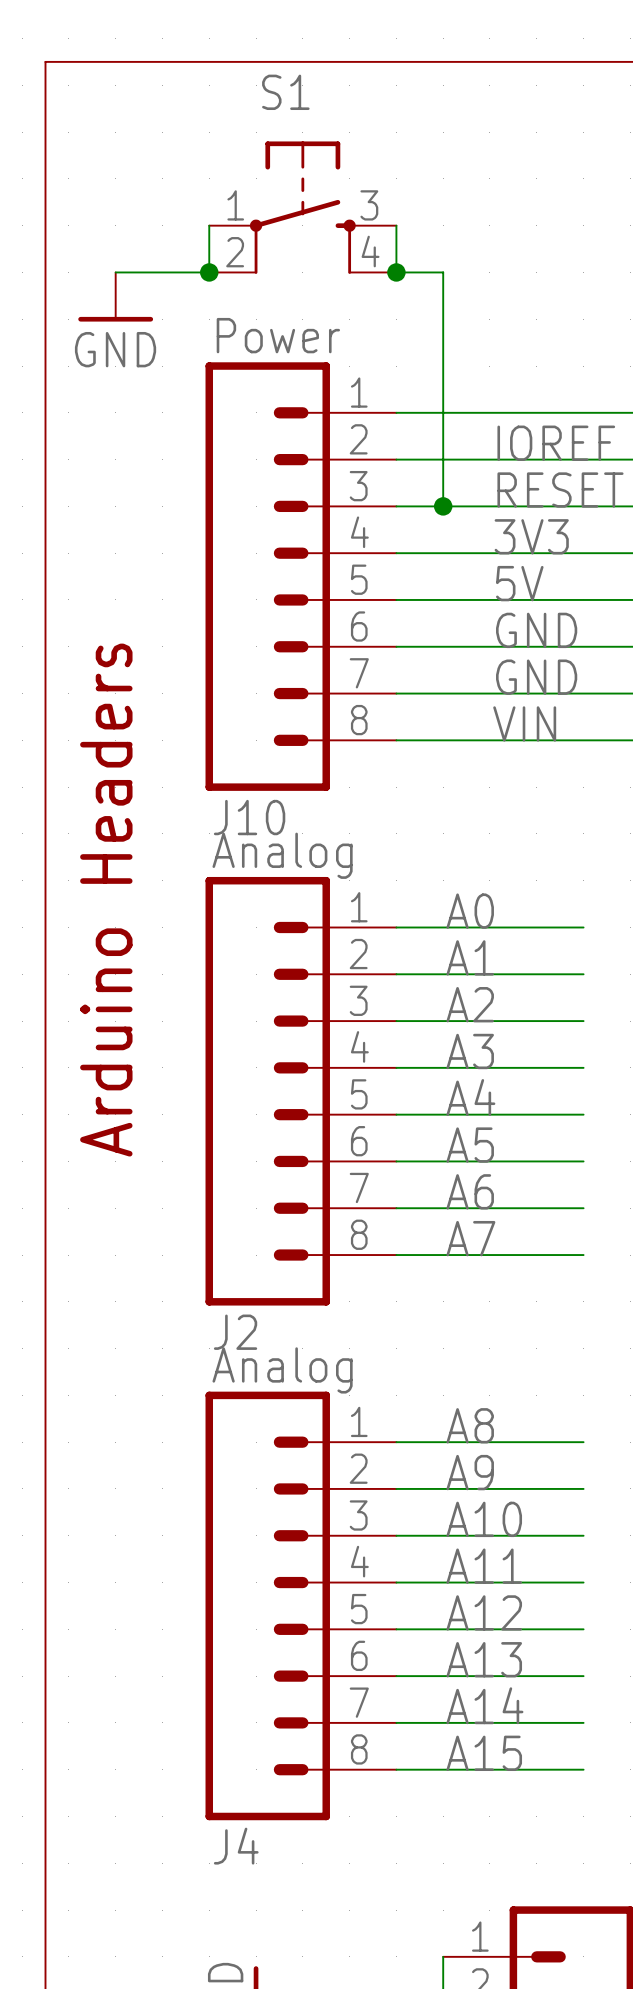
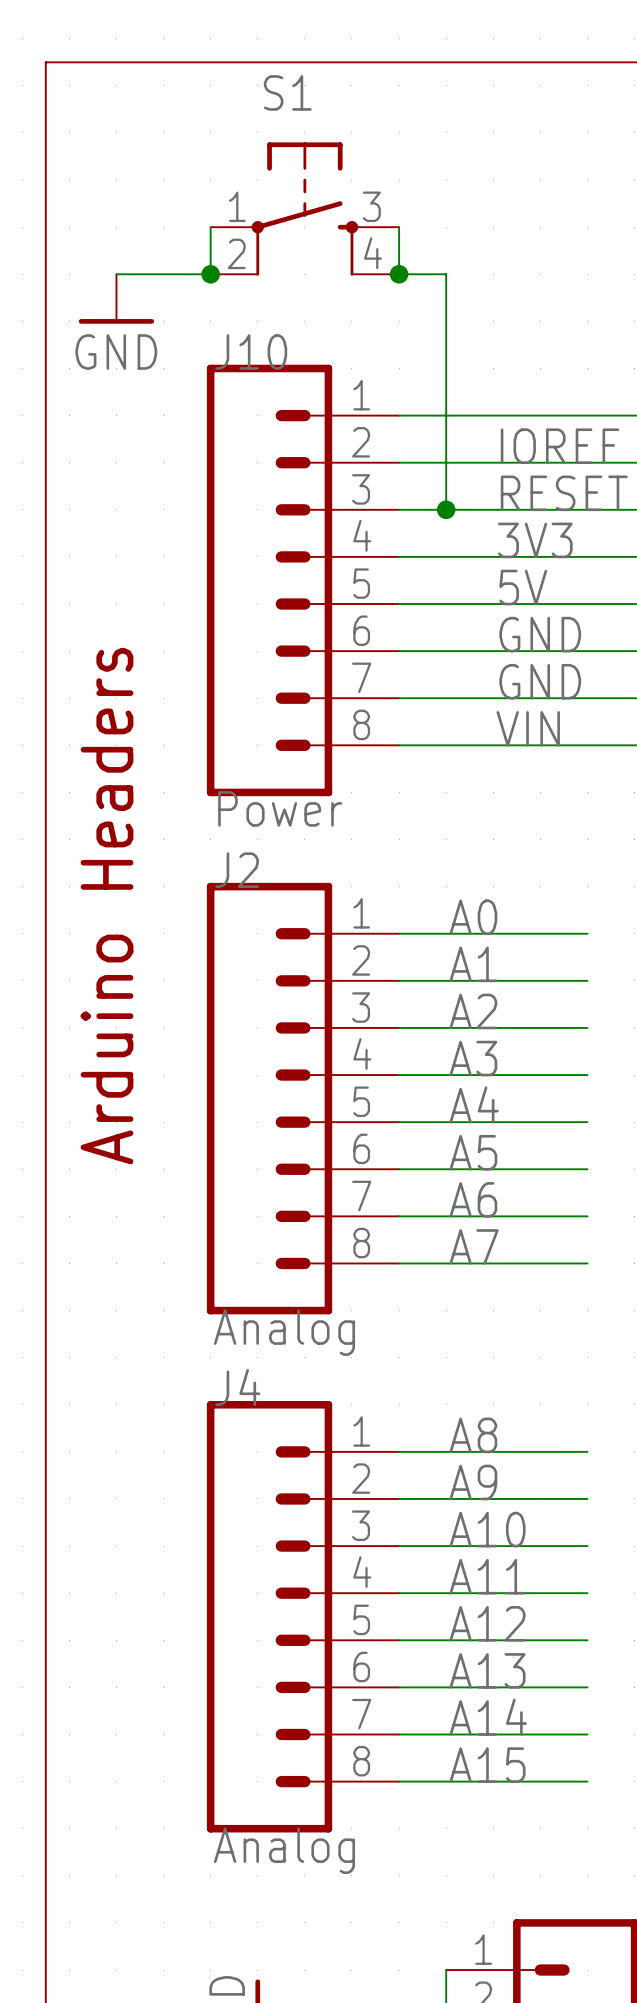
J10 value position: Power (278, 335) -> Power (280, 808)
J10 name position: J10 (249, 817) -> J10 (251, 352)
J2 value position: Analog (282, 855) -> Analog (284, 1332)
J2 name position: J2 (235, 1332) -> J2 (237, 870)
J4 value position: Analog (282, 1370) -> Analog (284, 1850)
J4 name position: J4 (236, 1846) -> J4 (237, 1387)

